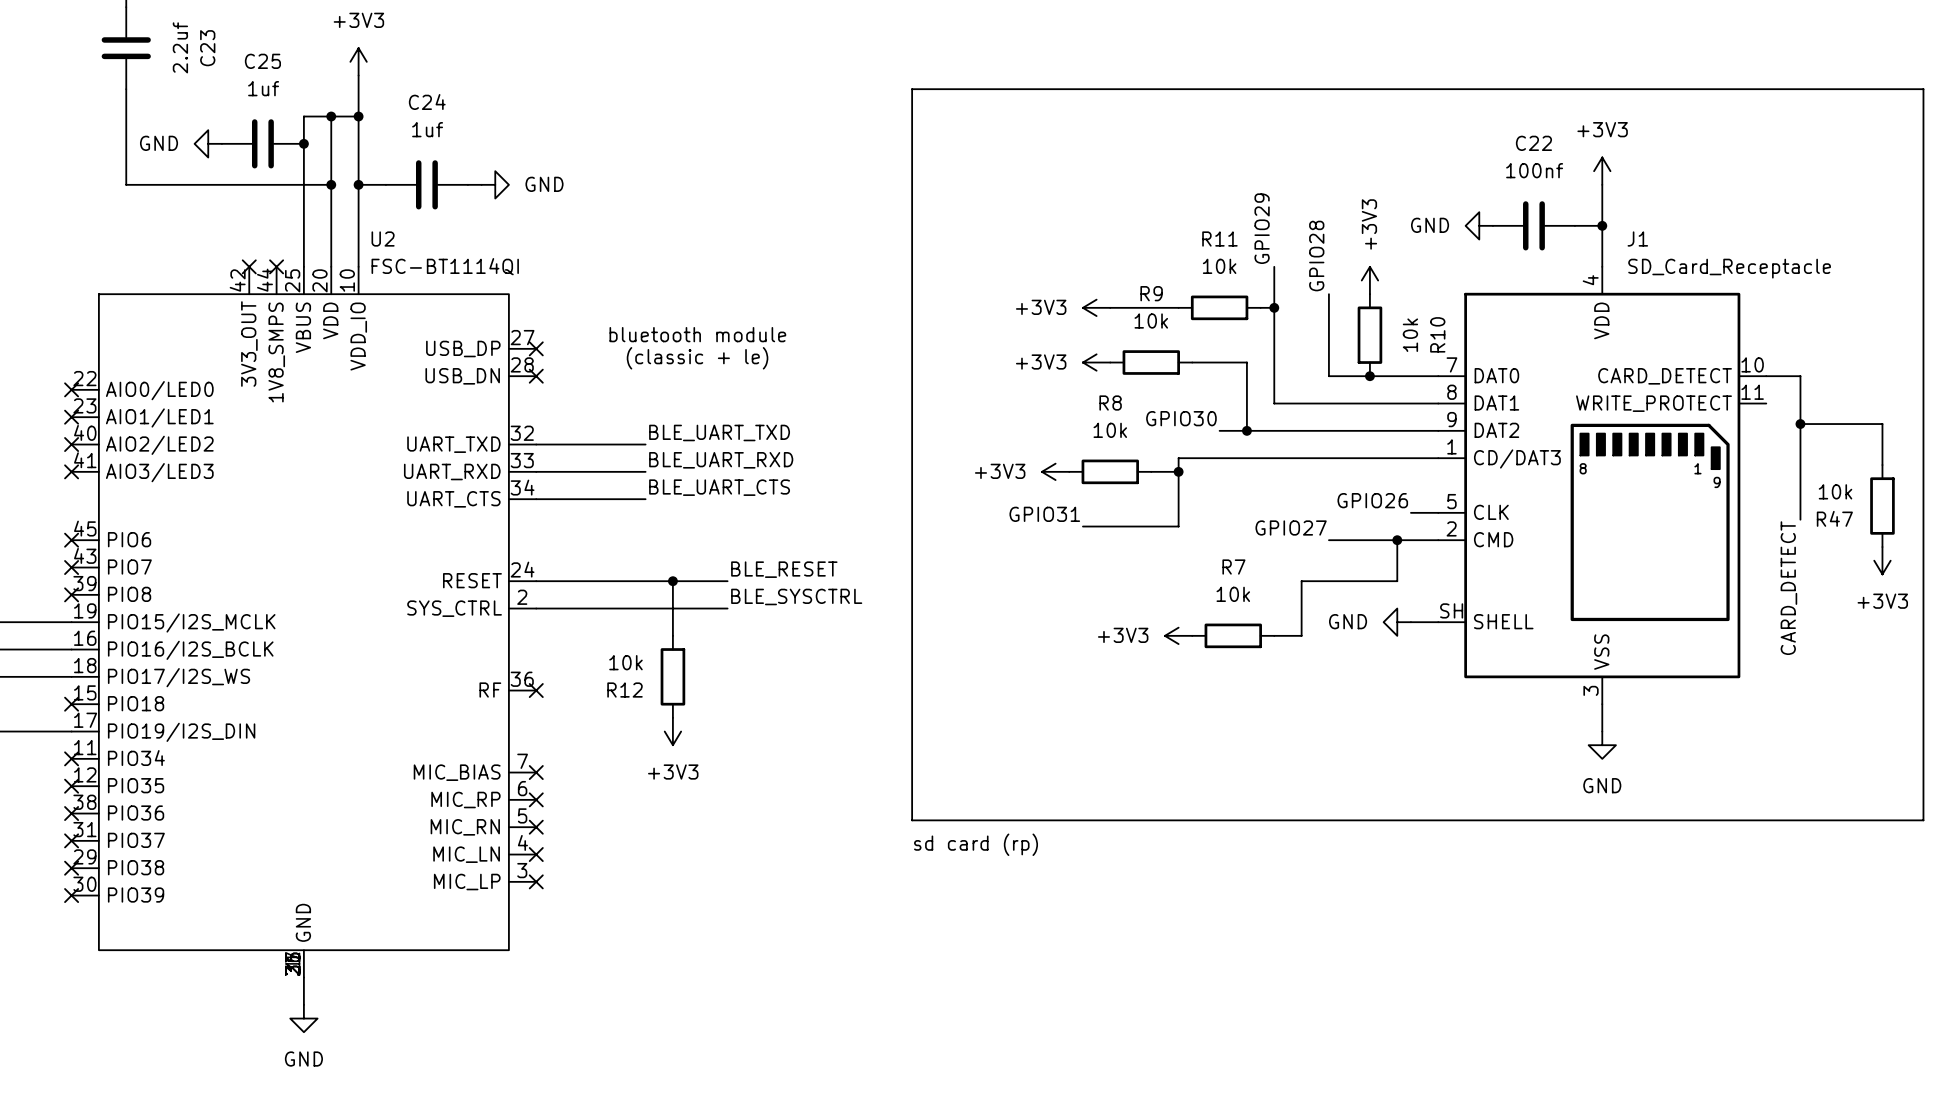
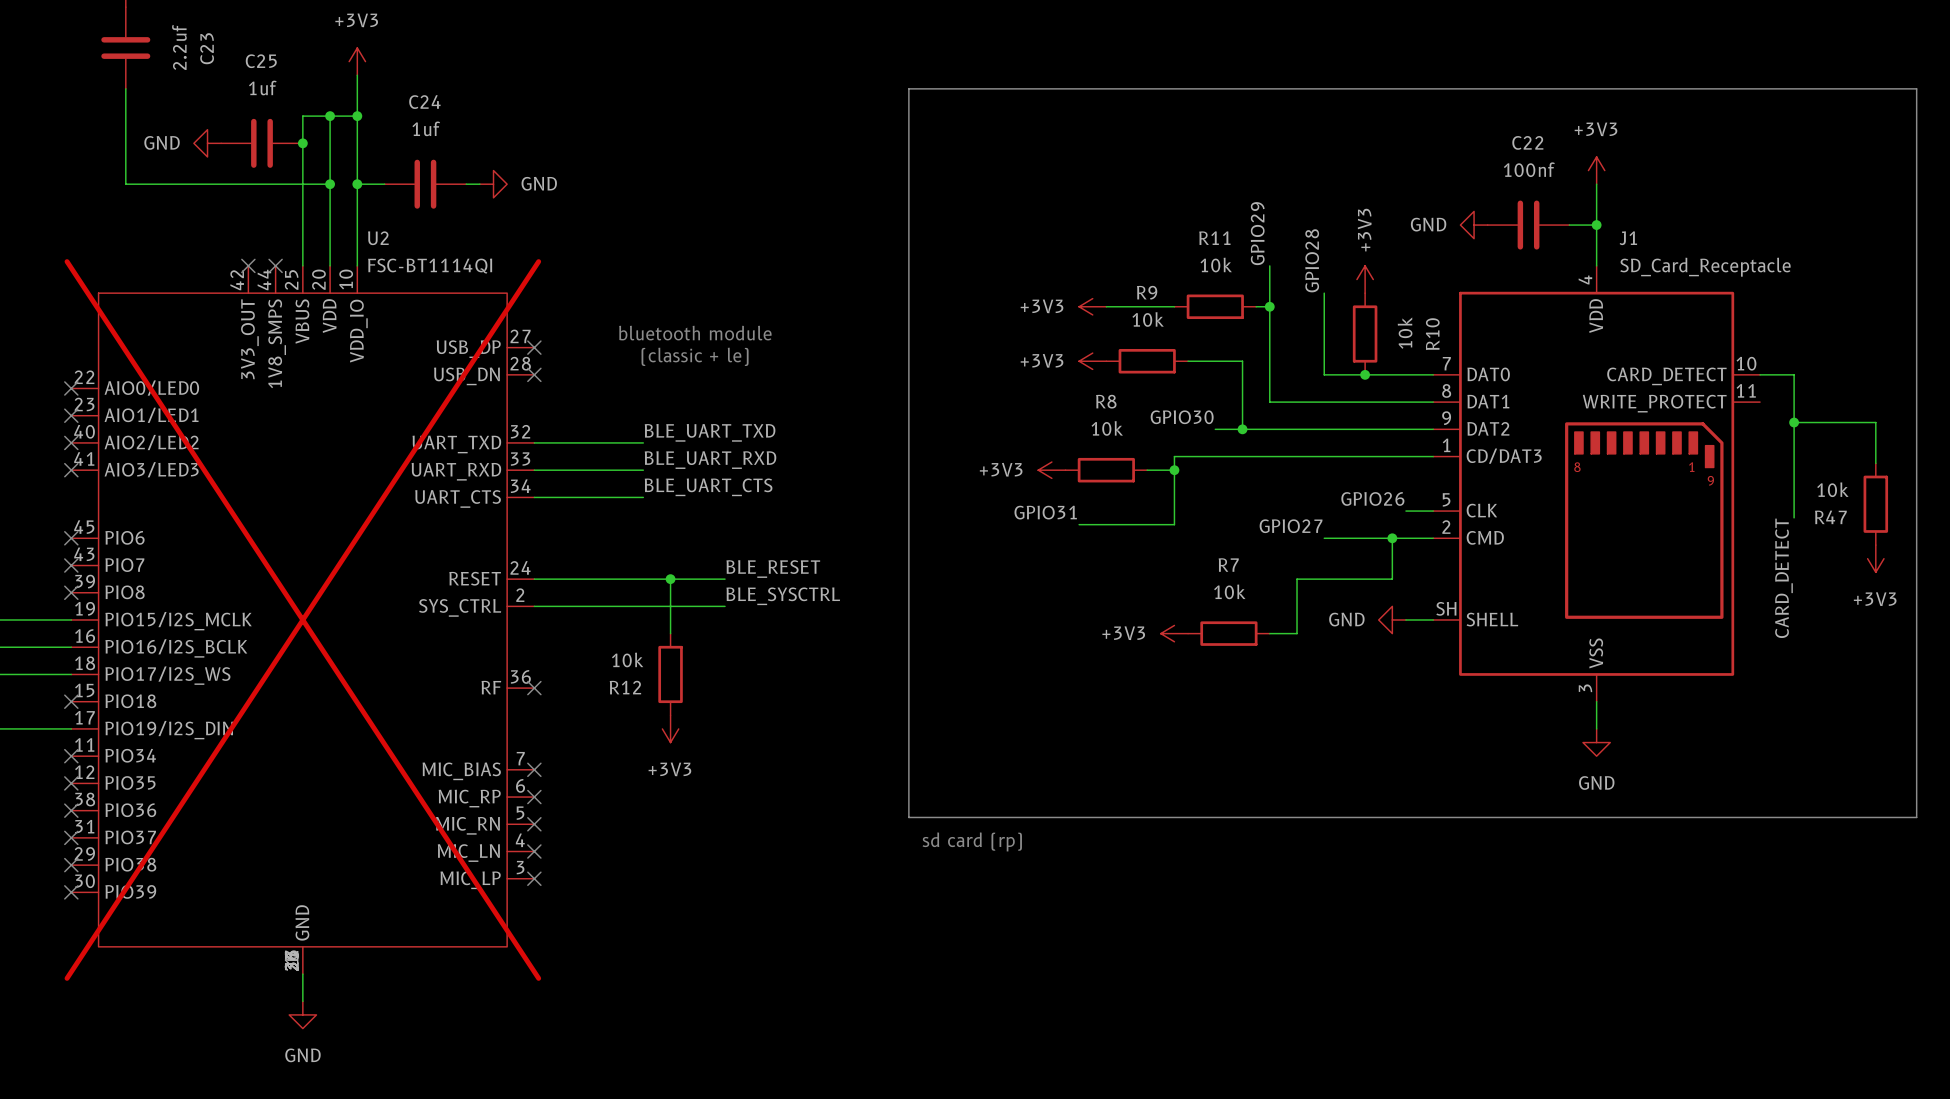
U2 do-not-place cross: none -> (302, 619)

